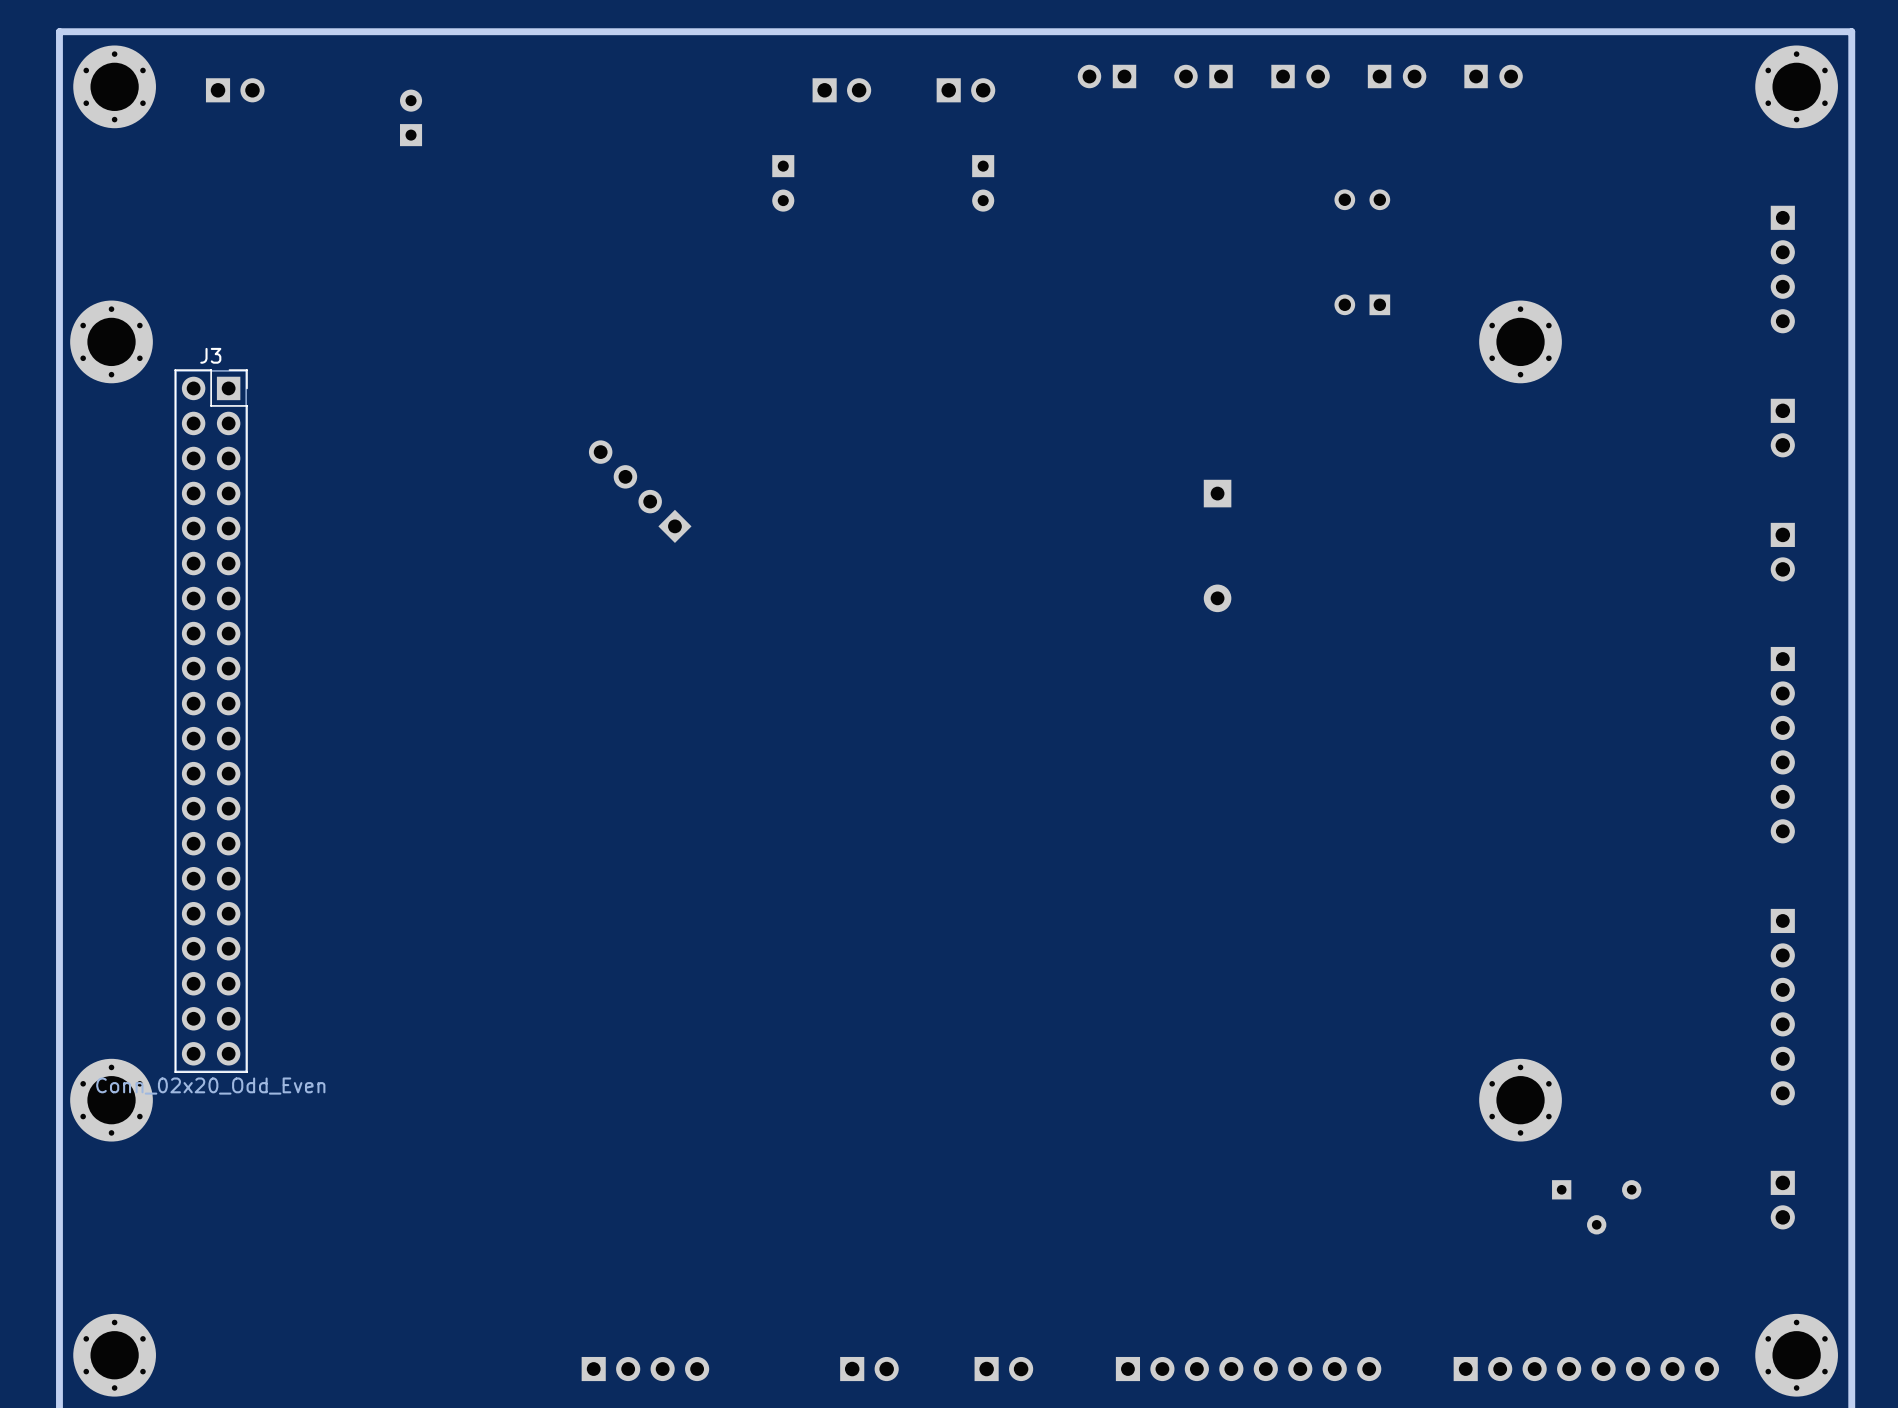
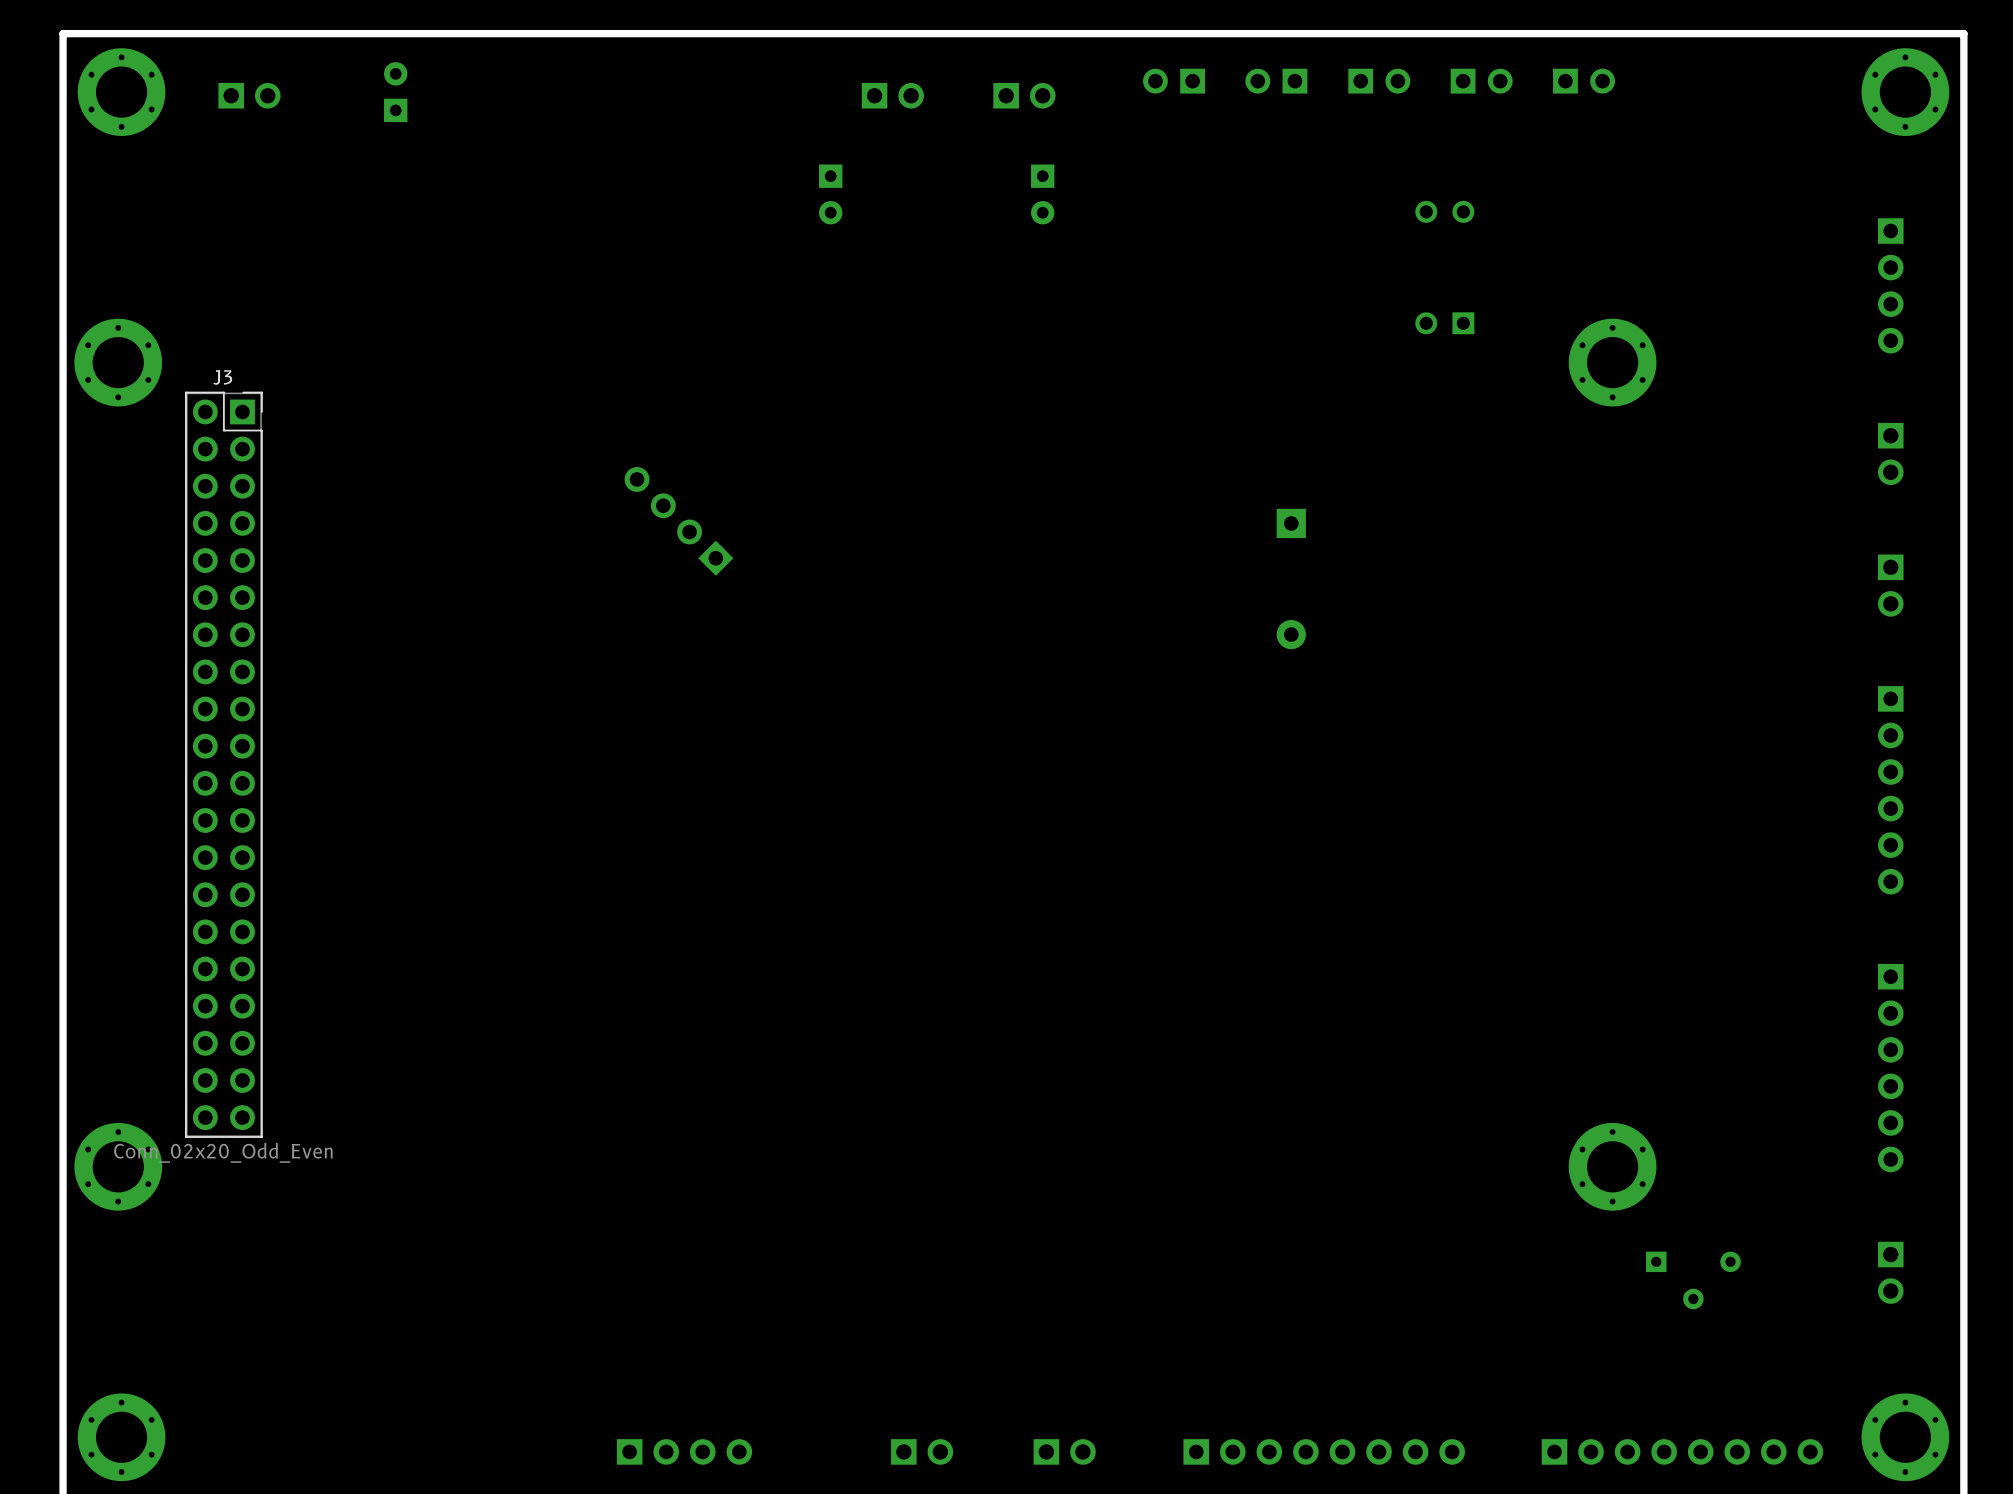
part position: (411, 117) -> (395, 92)

